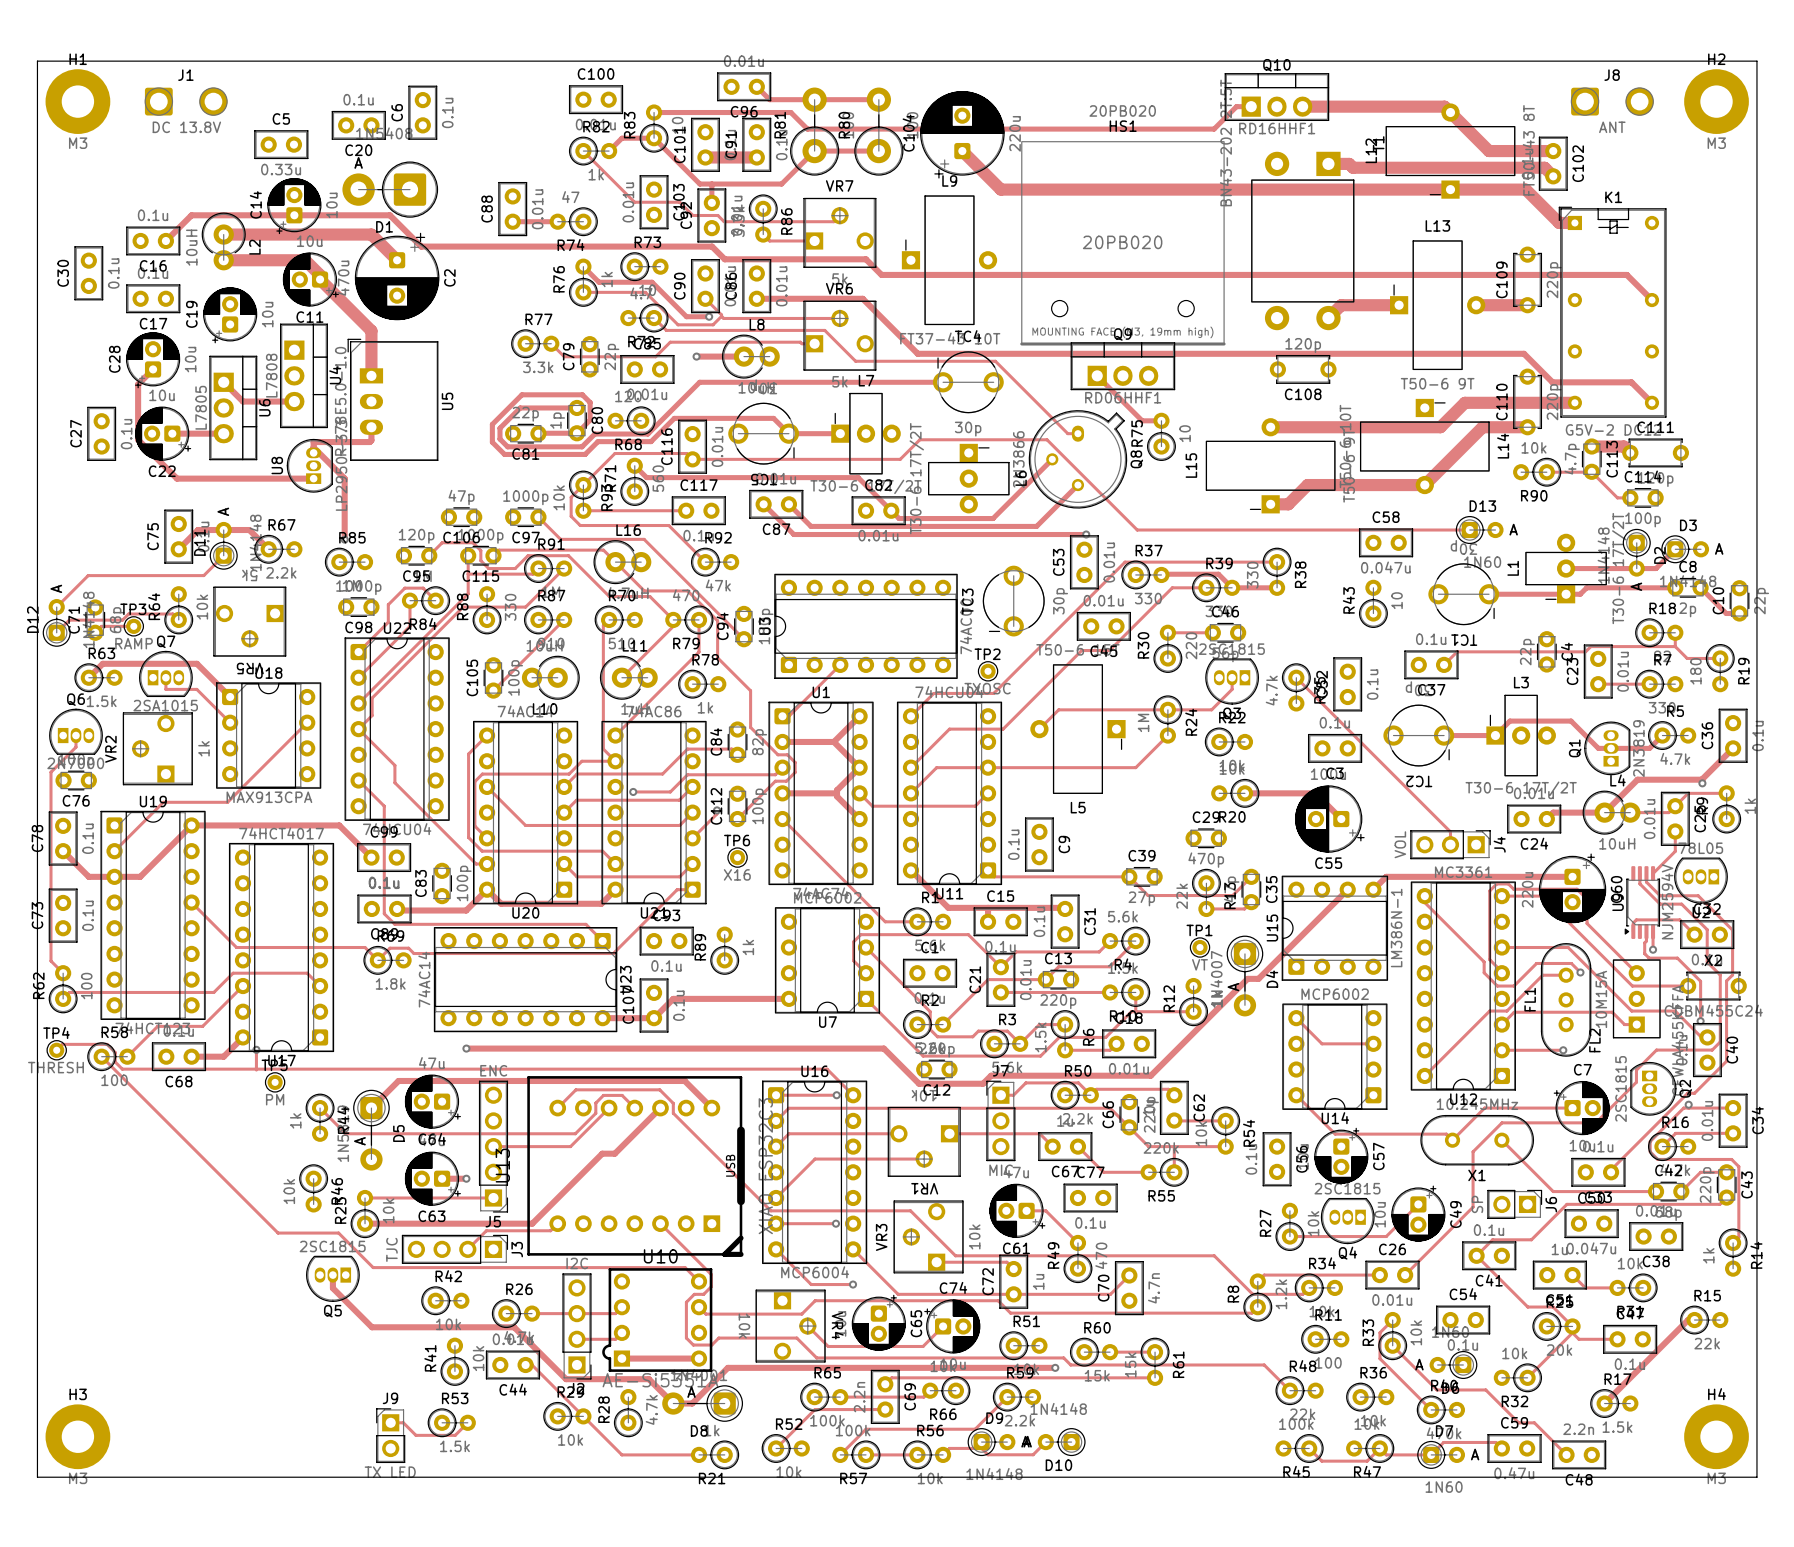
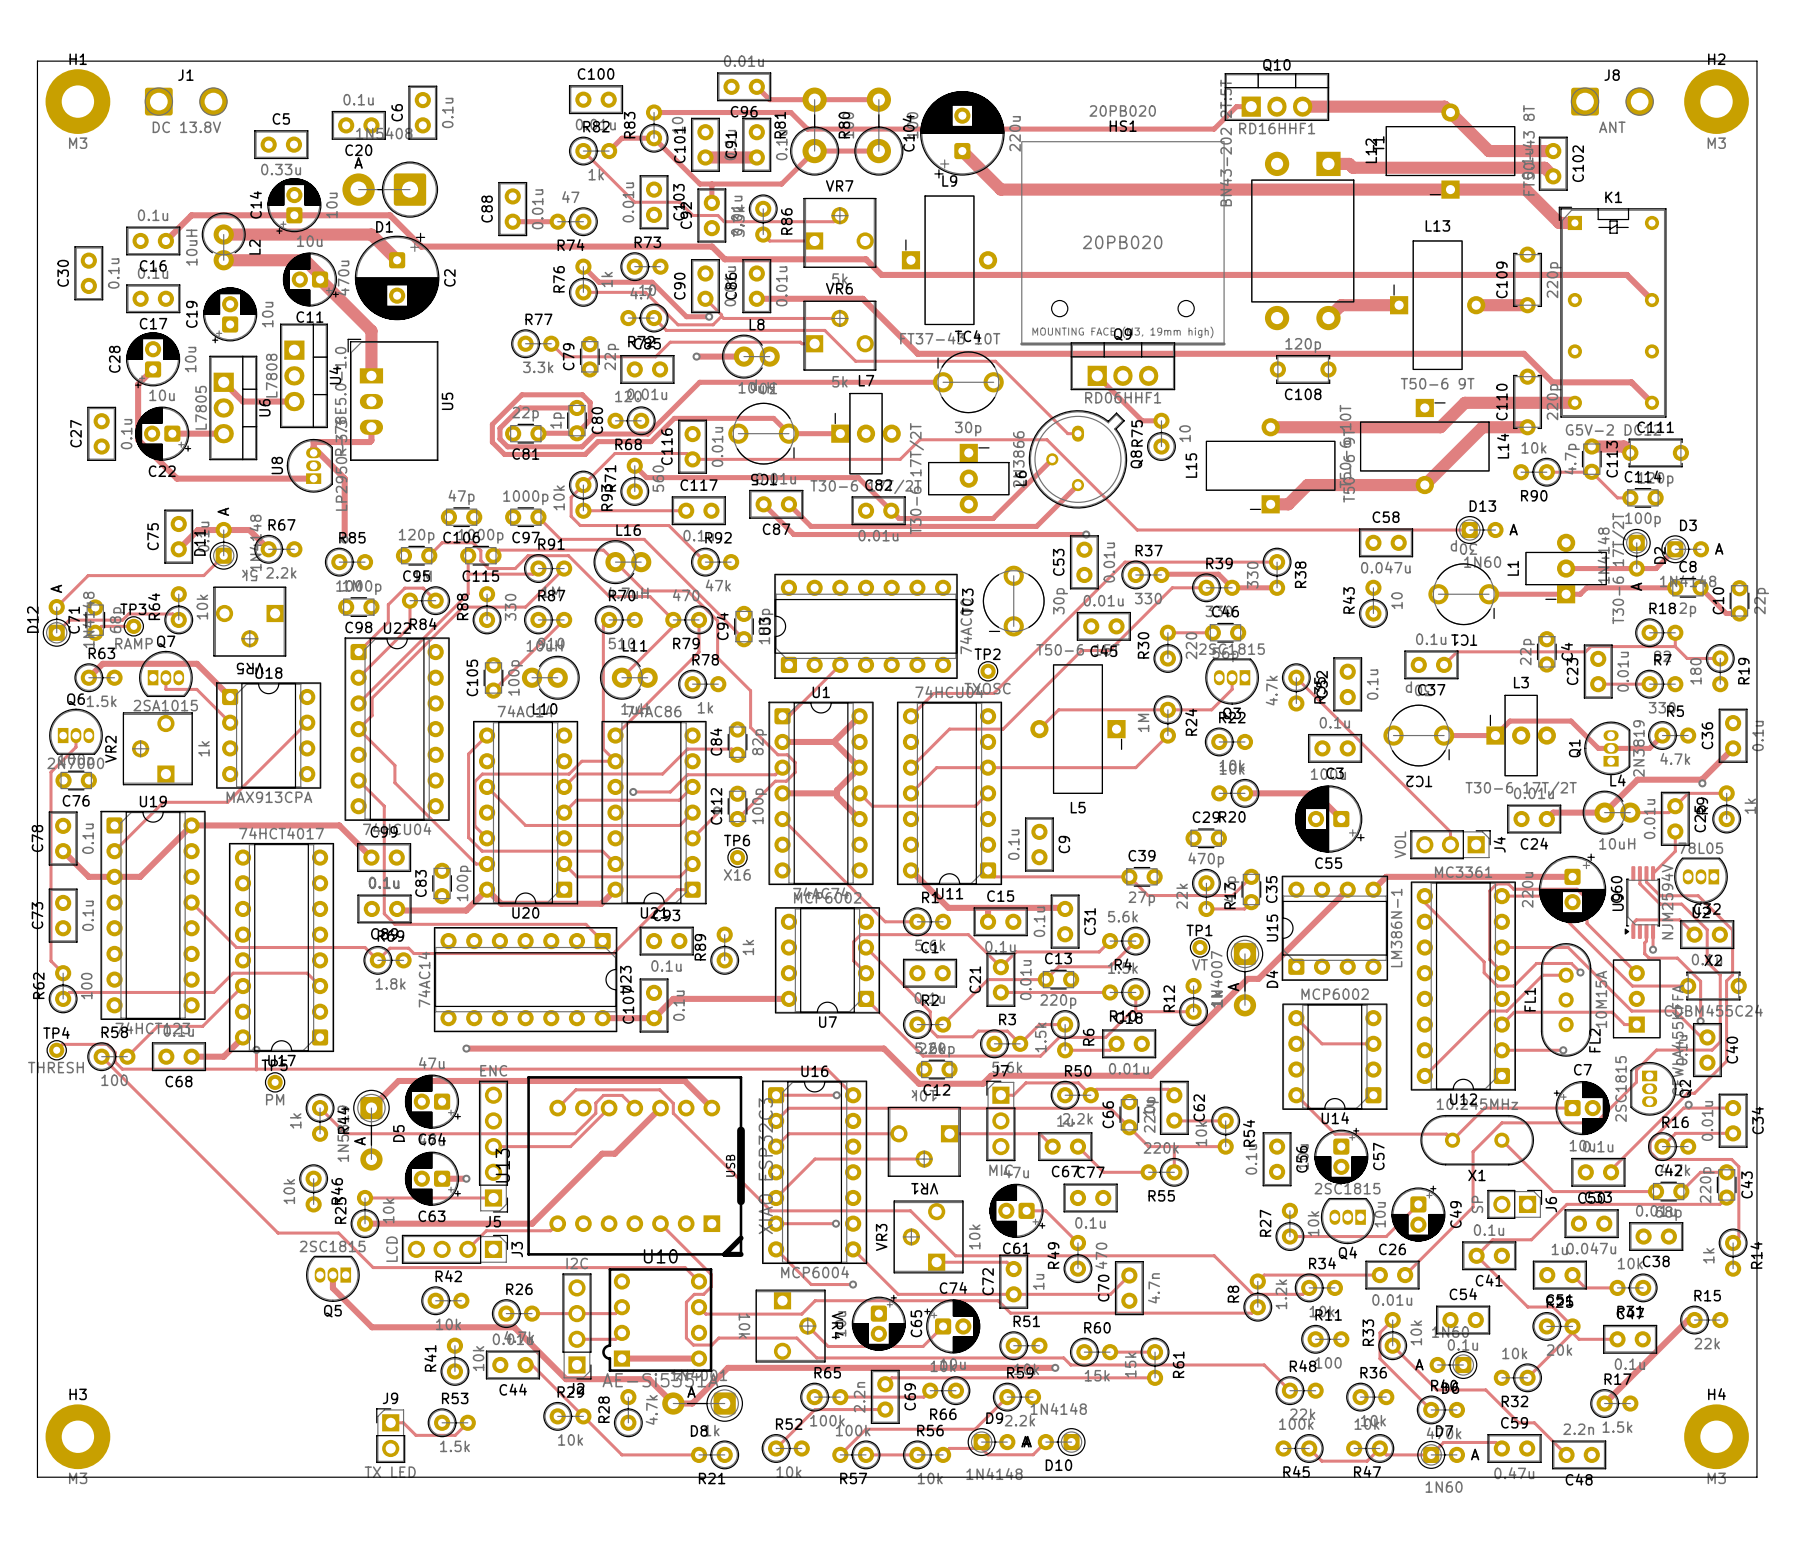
J3 value: TJC (391, 1249) -> LCD (391, 1249)

